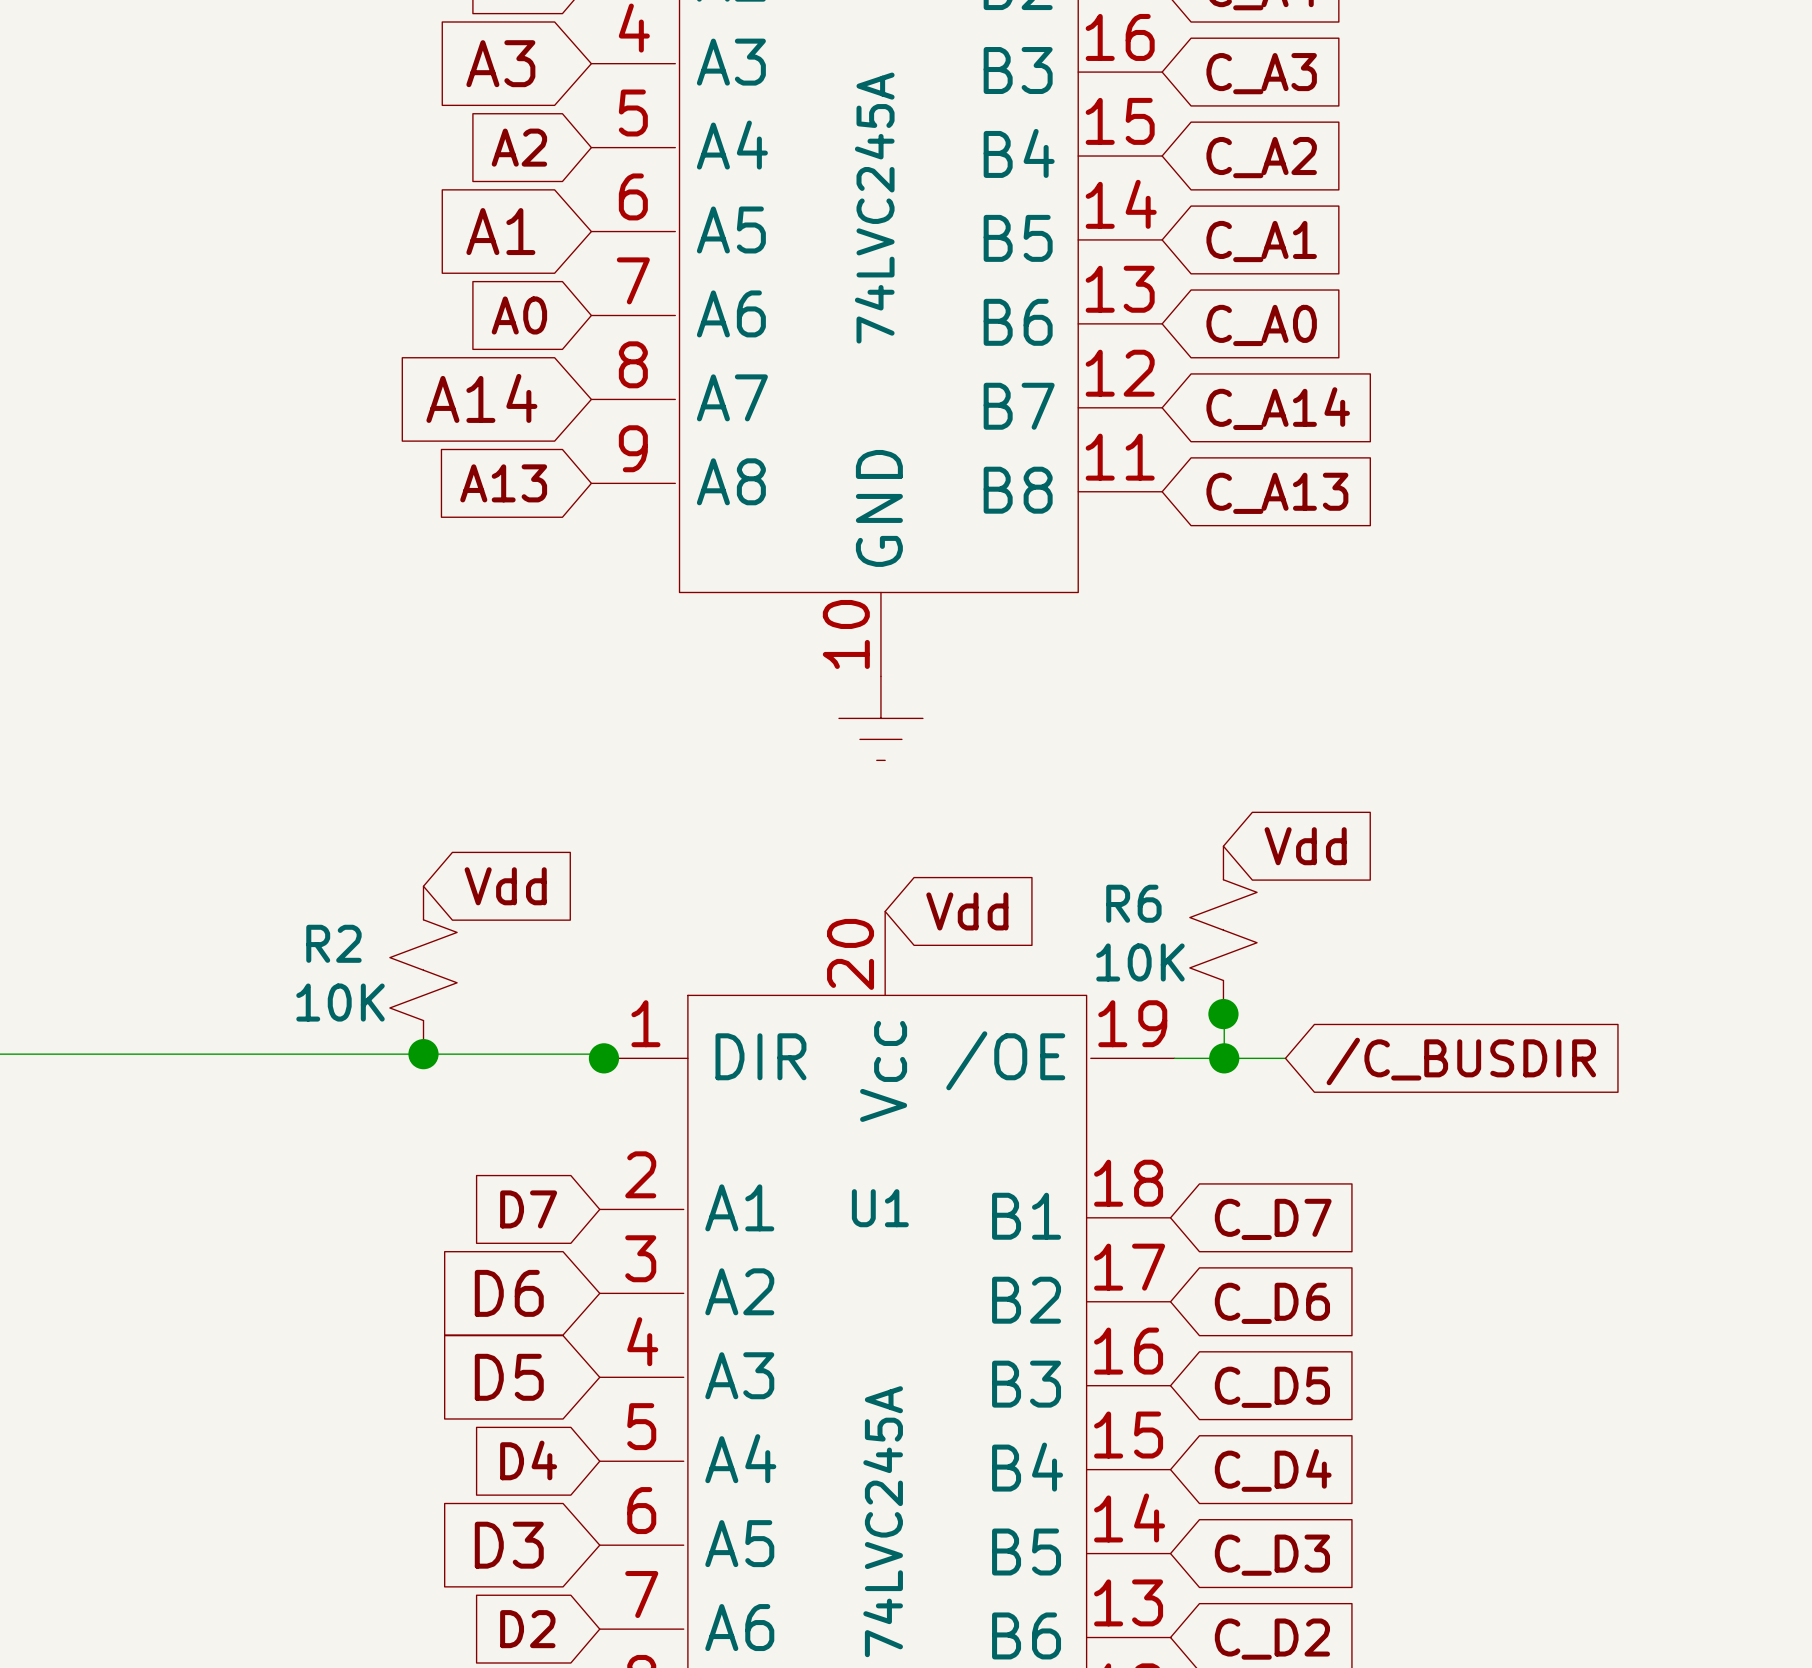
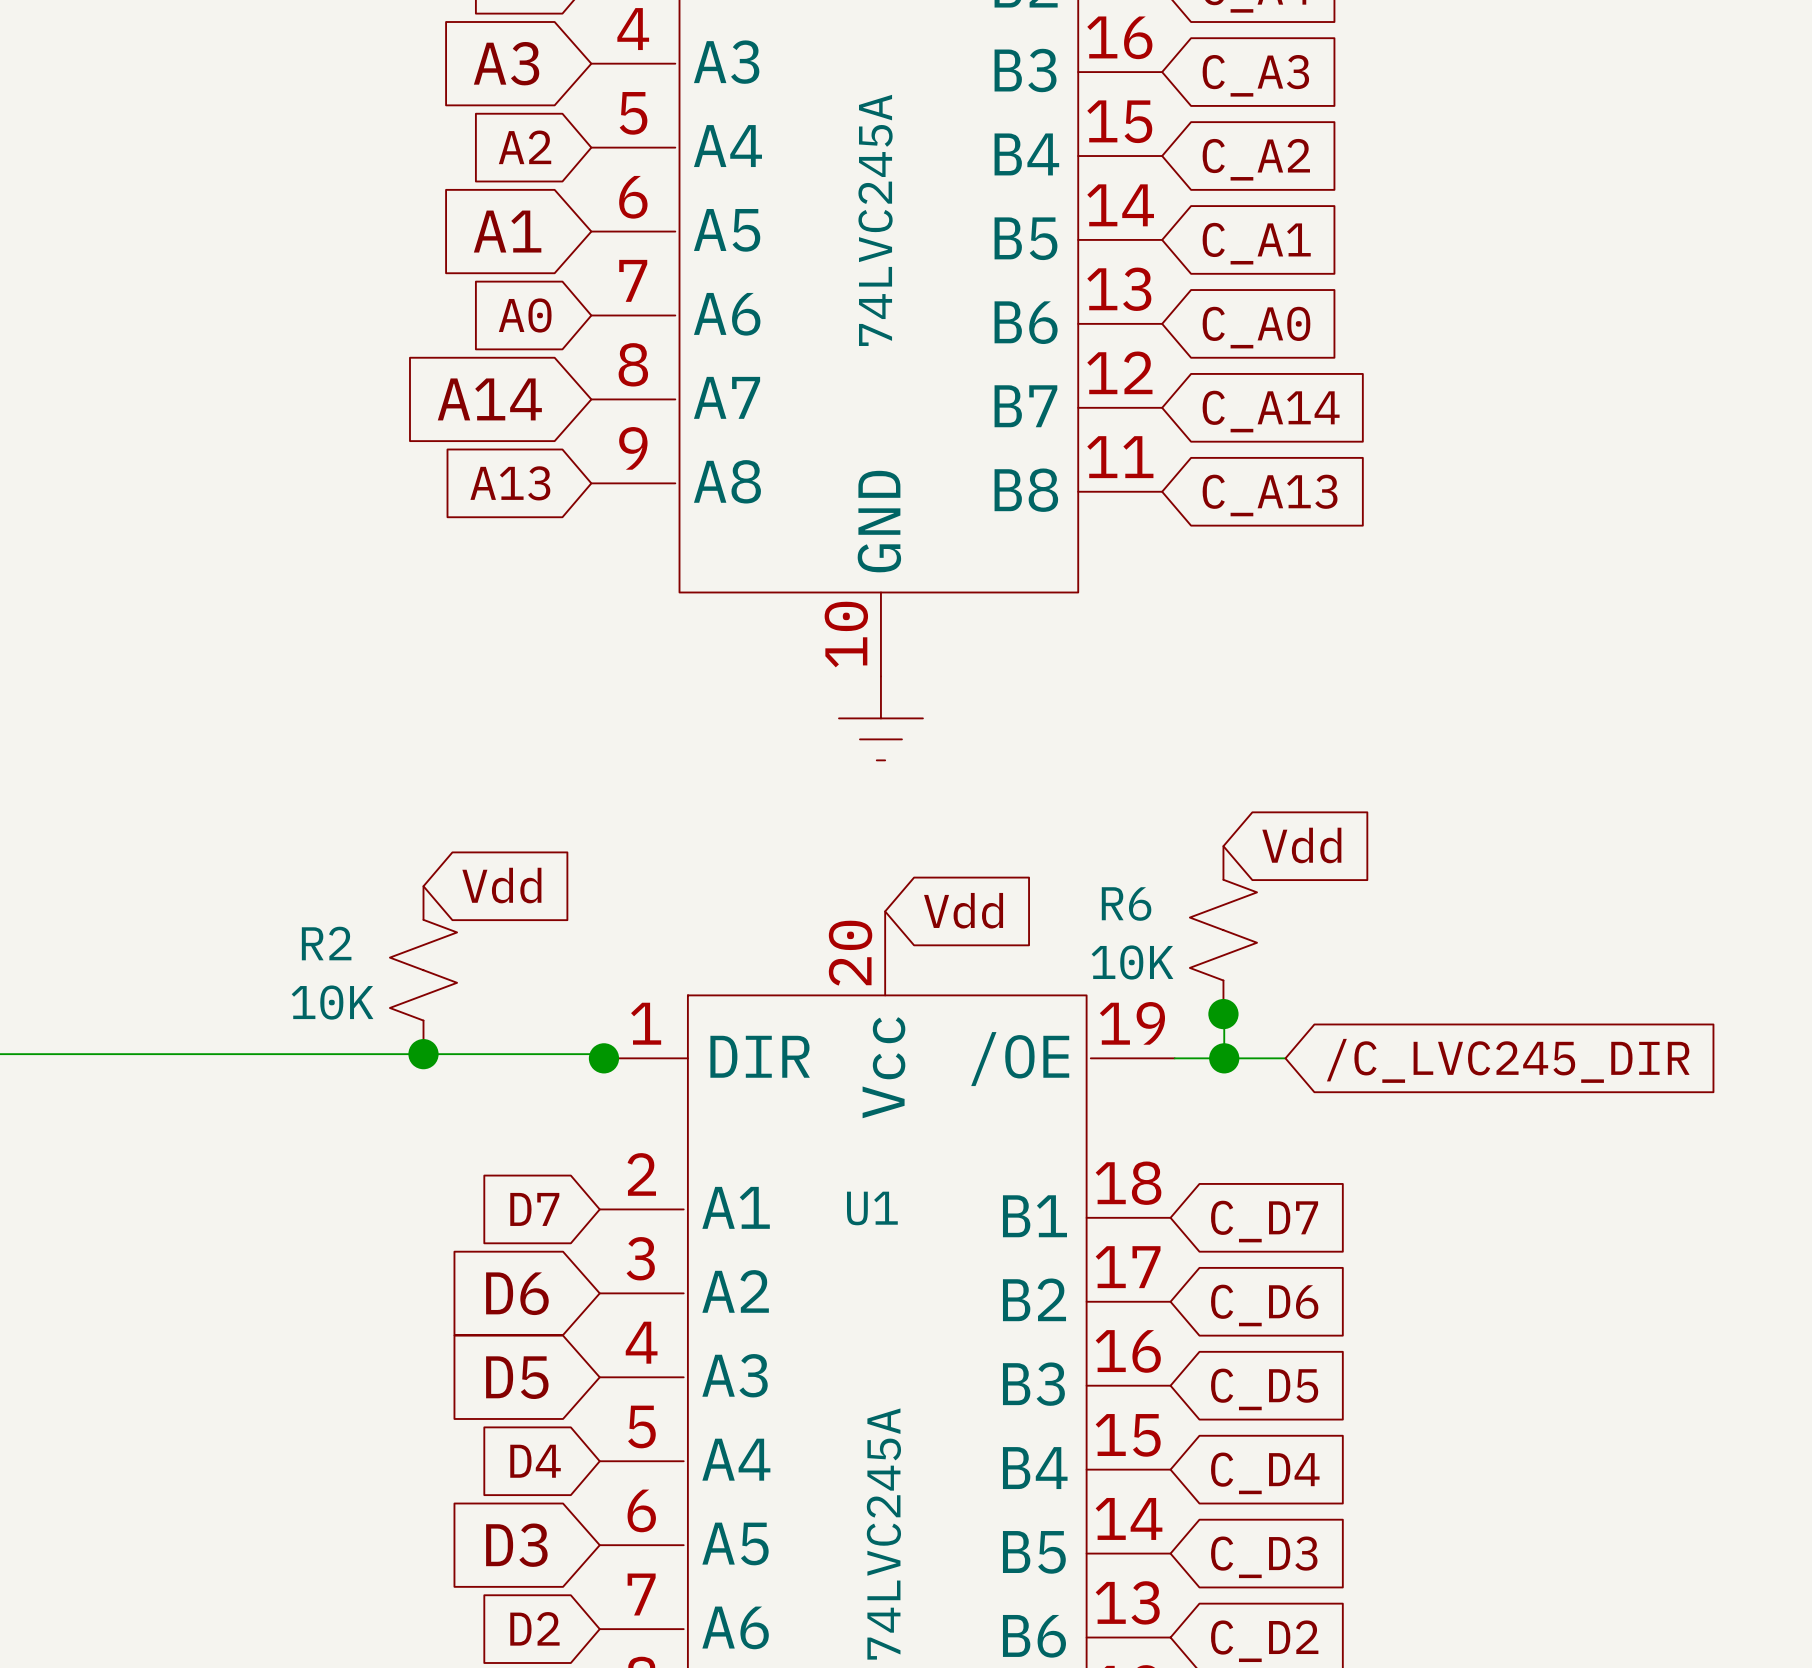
global label: /C_BUSDIR (1461, 1061) -> /C_LVC245_DIR (1508, 1060)

